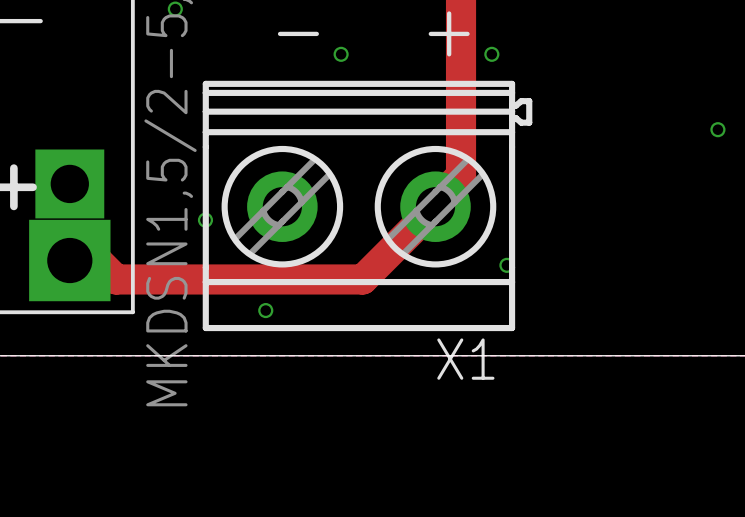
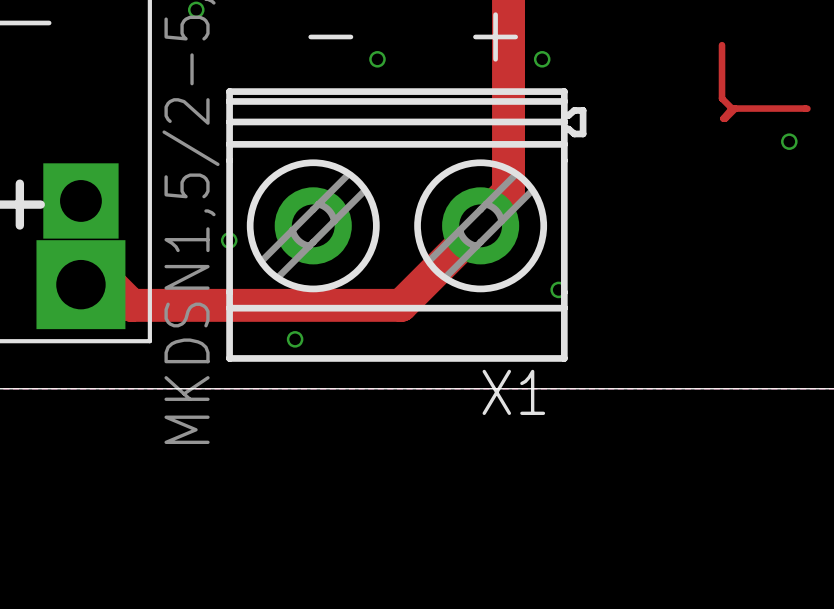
top track: none -> (722, 45) (722, 98) (732, 108) (723, 118) (735, 108) (807, 108)

